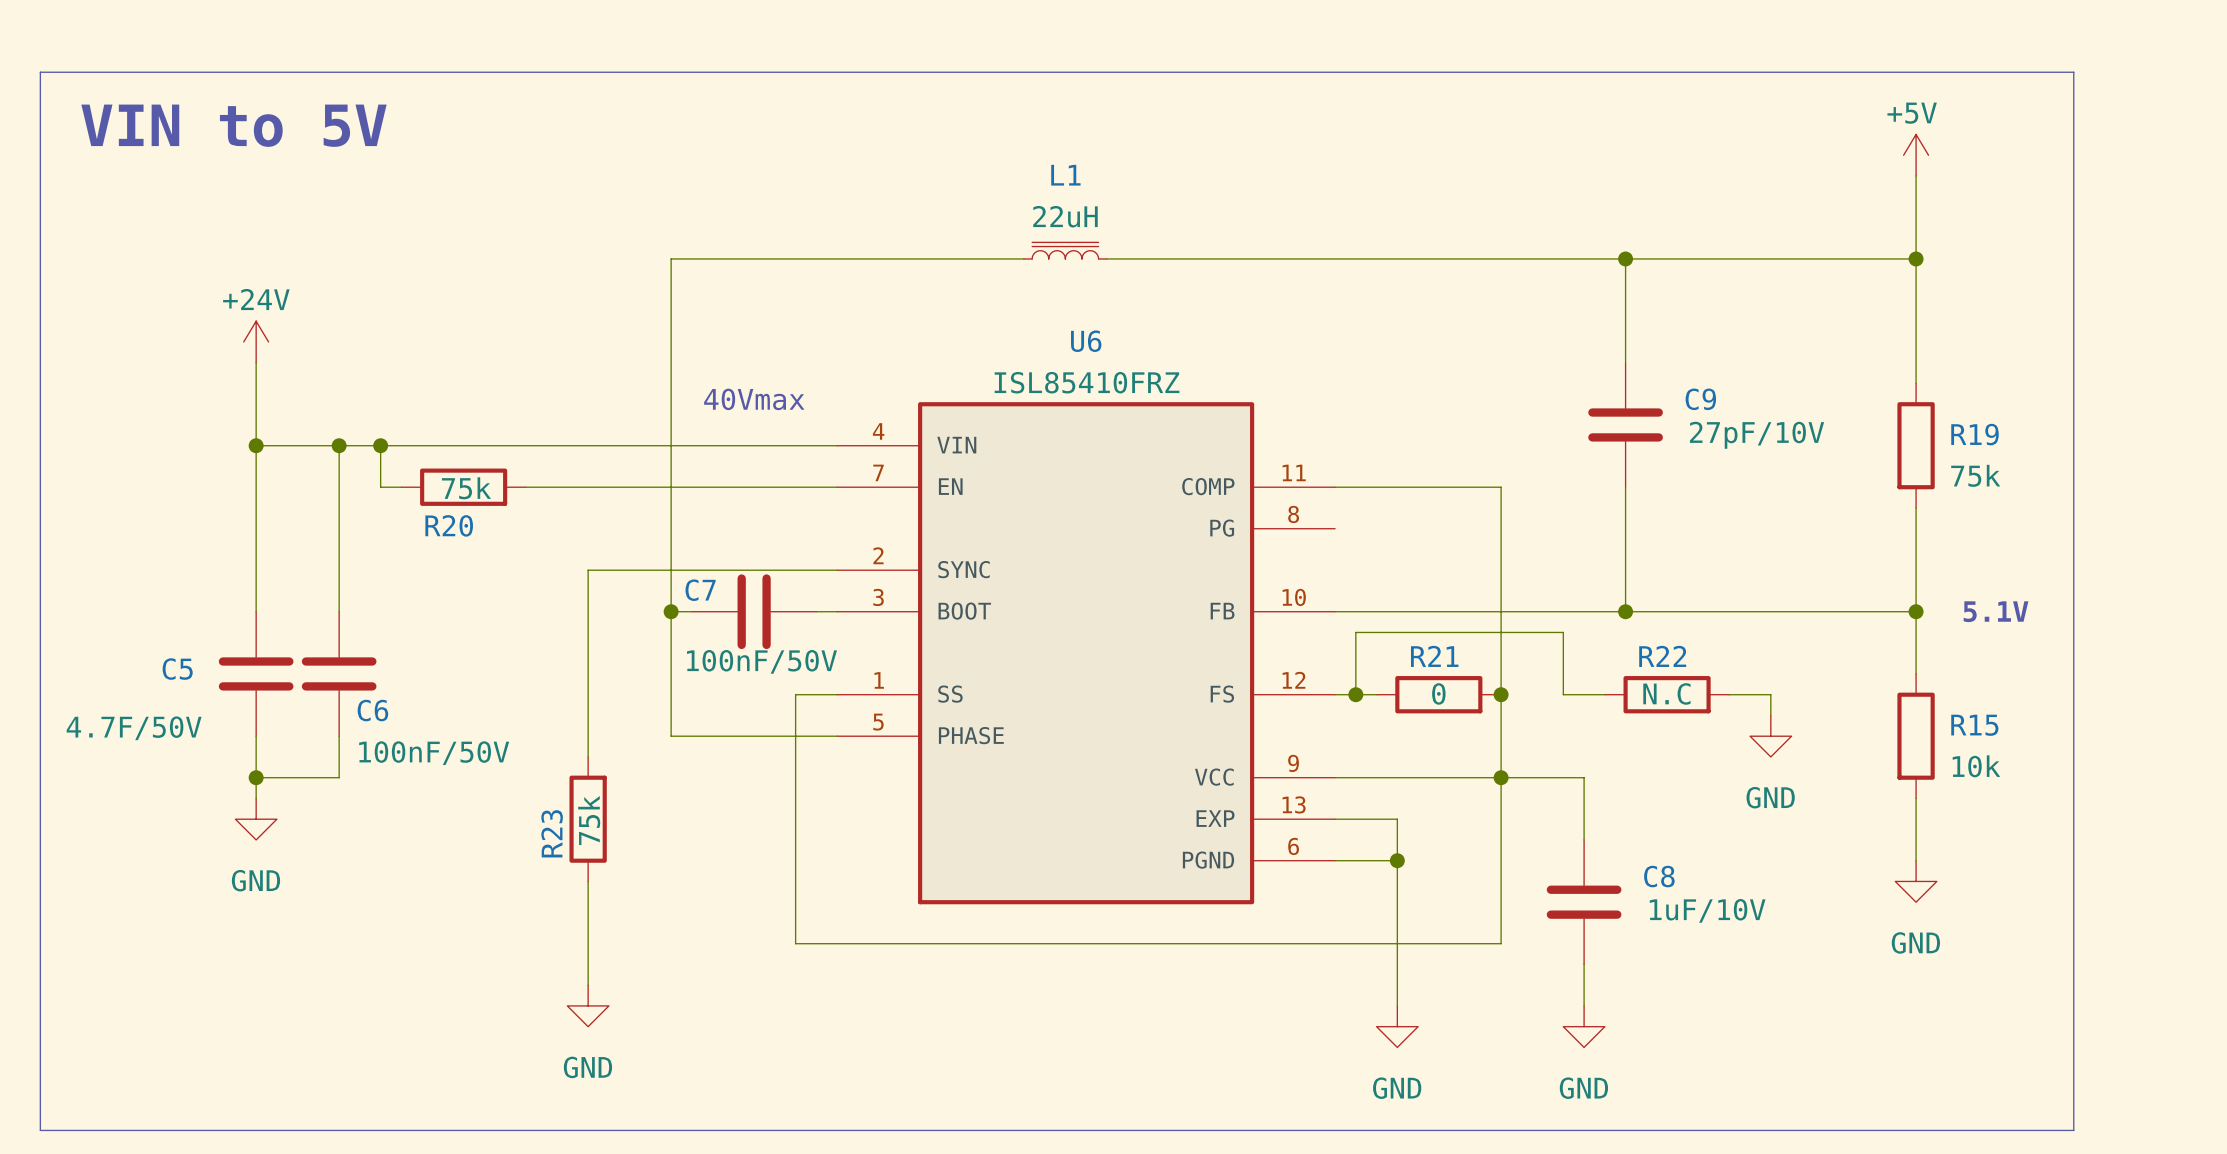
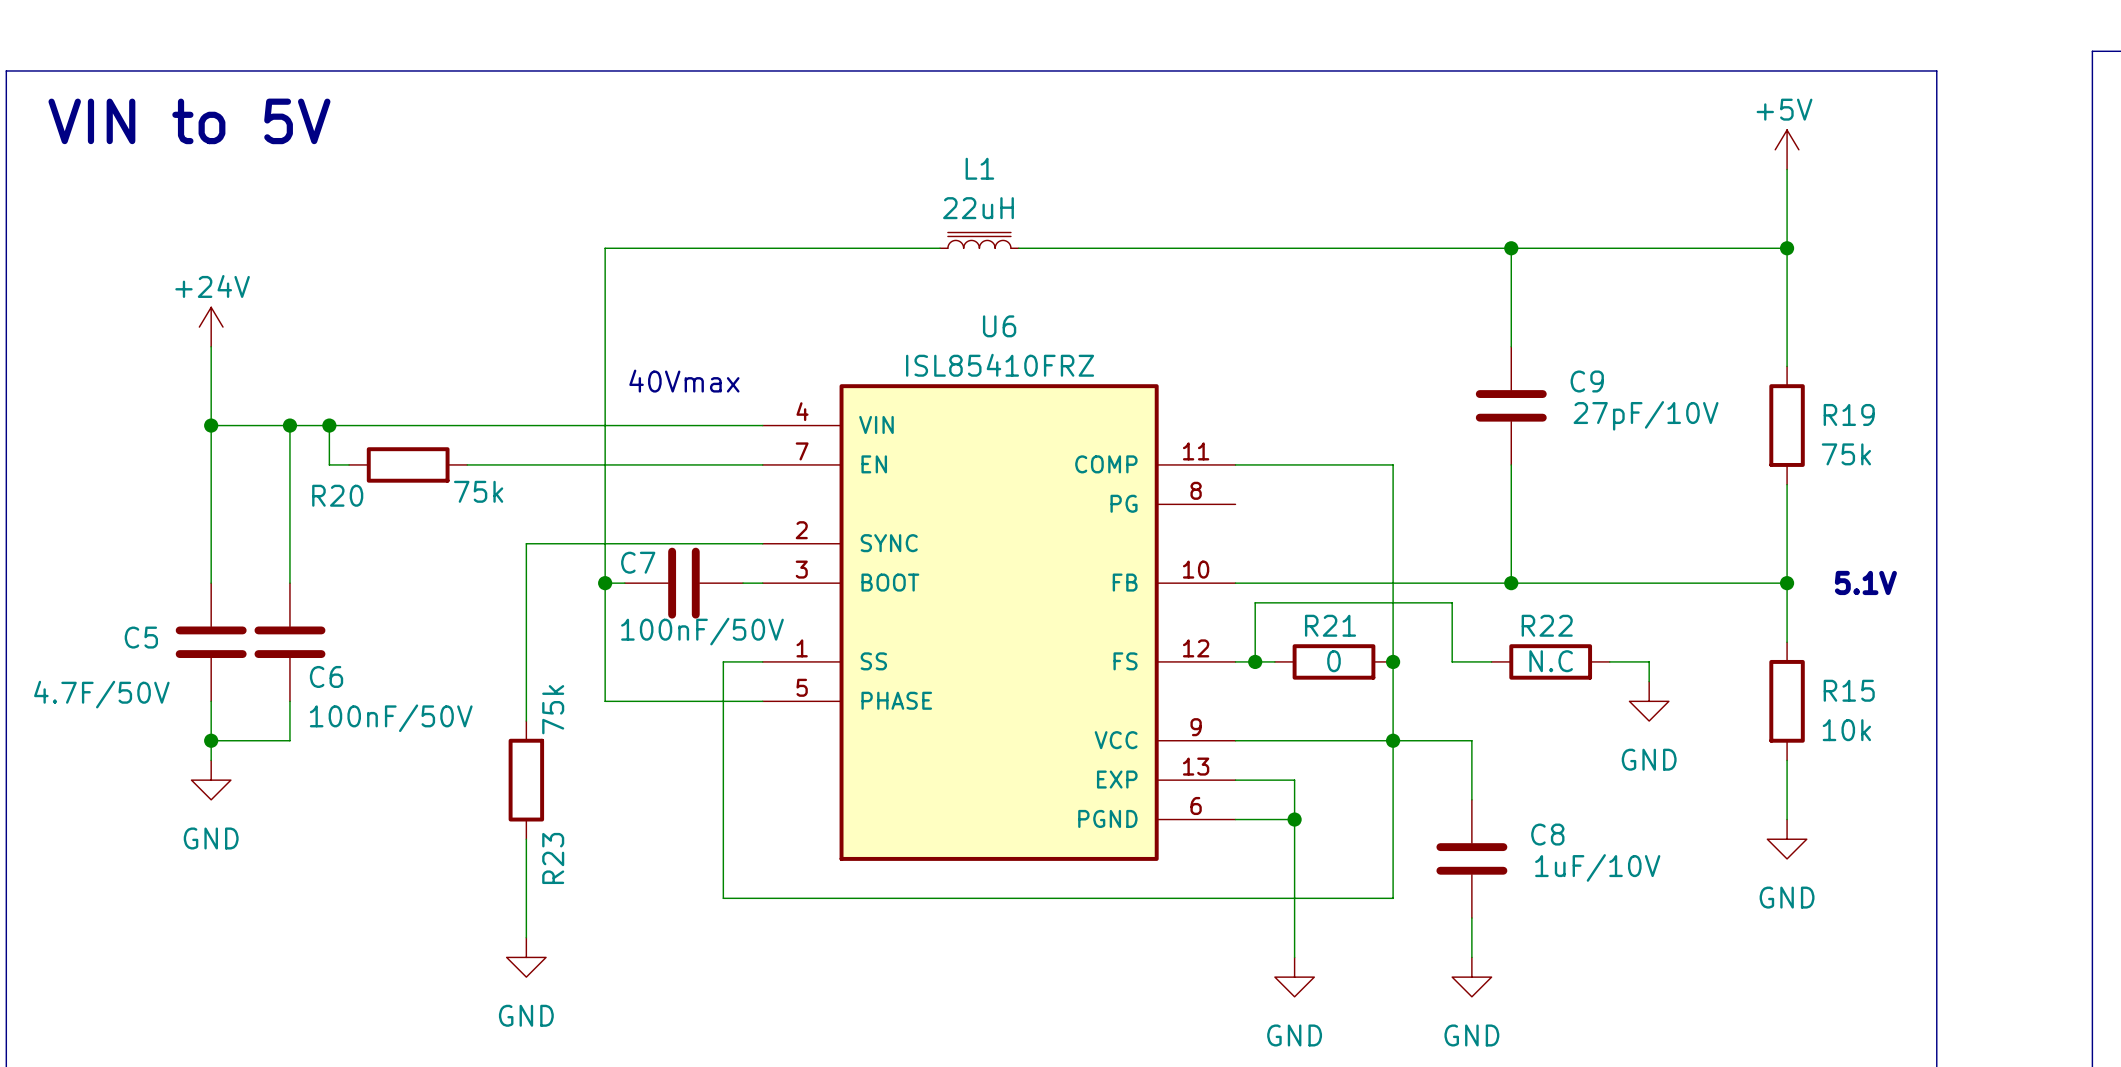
R20 value position: 75k (466, 488) -> 75k (478, 491)
R20 name position: R20 (449, 525) -> R20 (337, 495)
R23 value position: 75k (589, 820) -> 75k (553, 709)
R23 name position: R23 (552, 833) -> R23 (553, 858)

